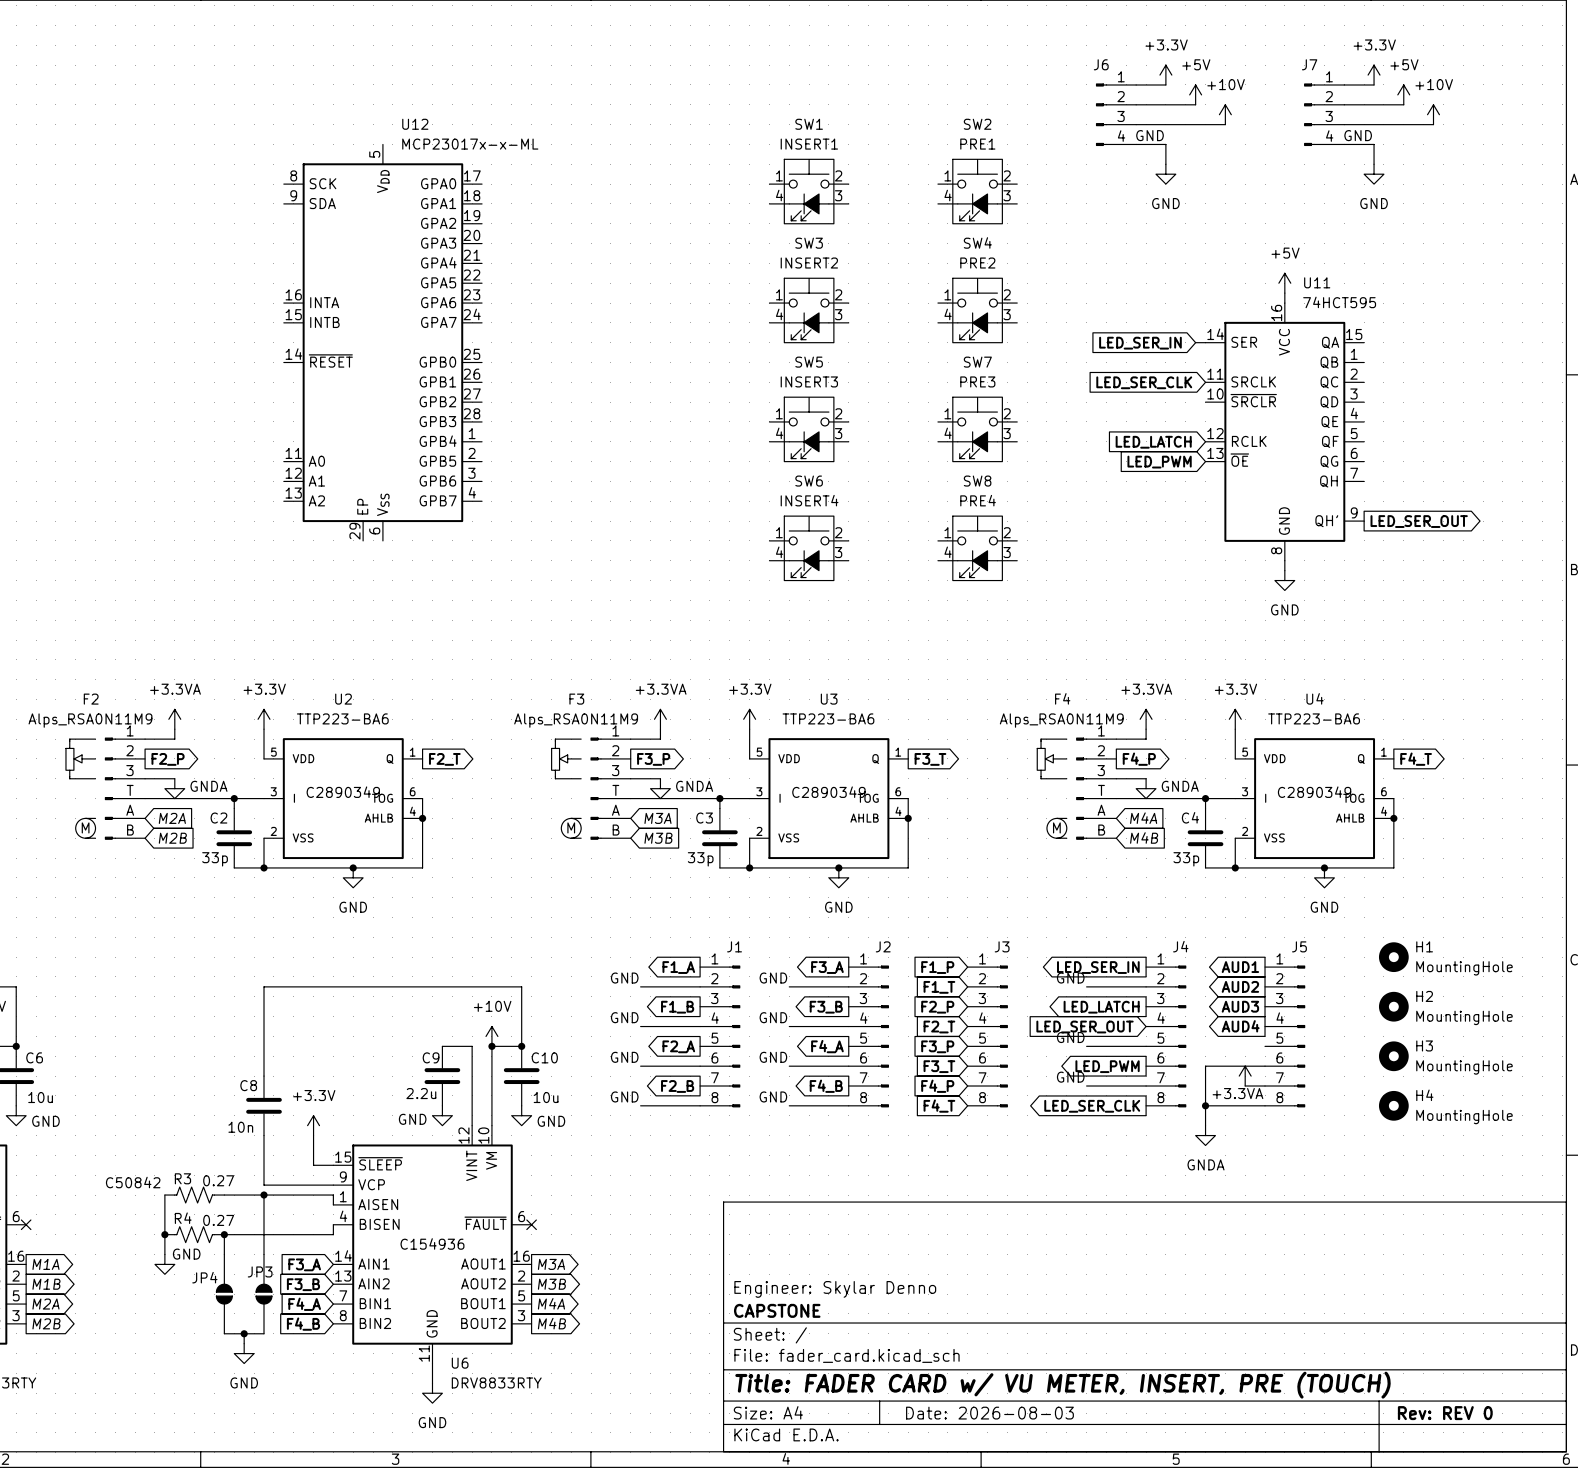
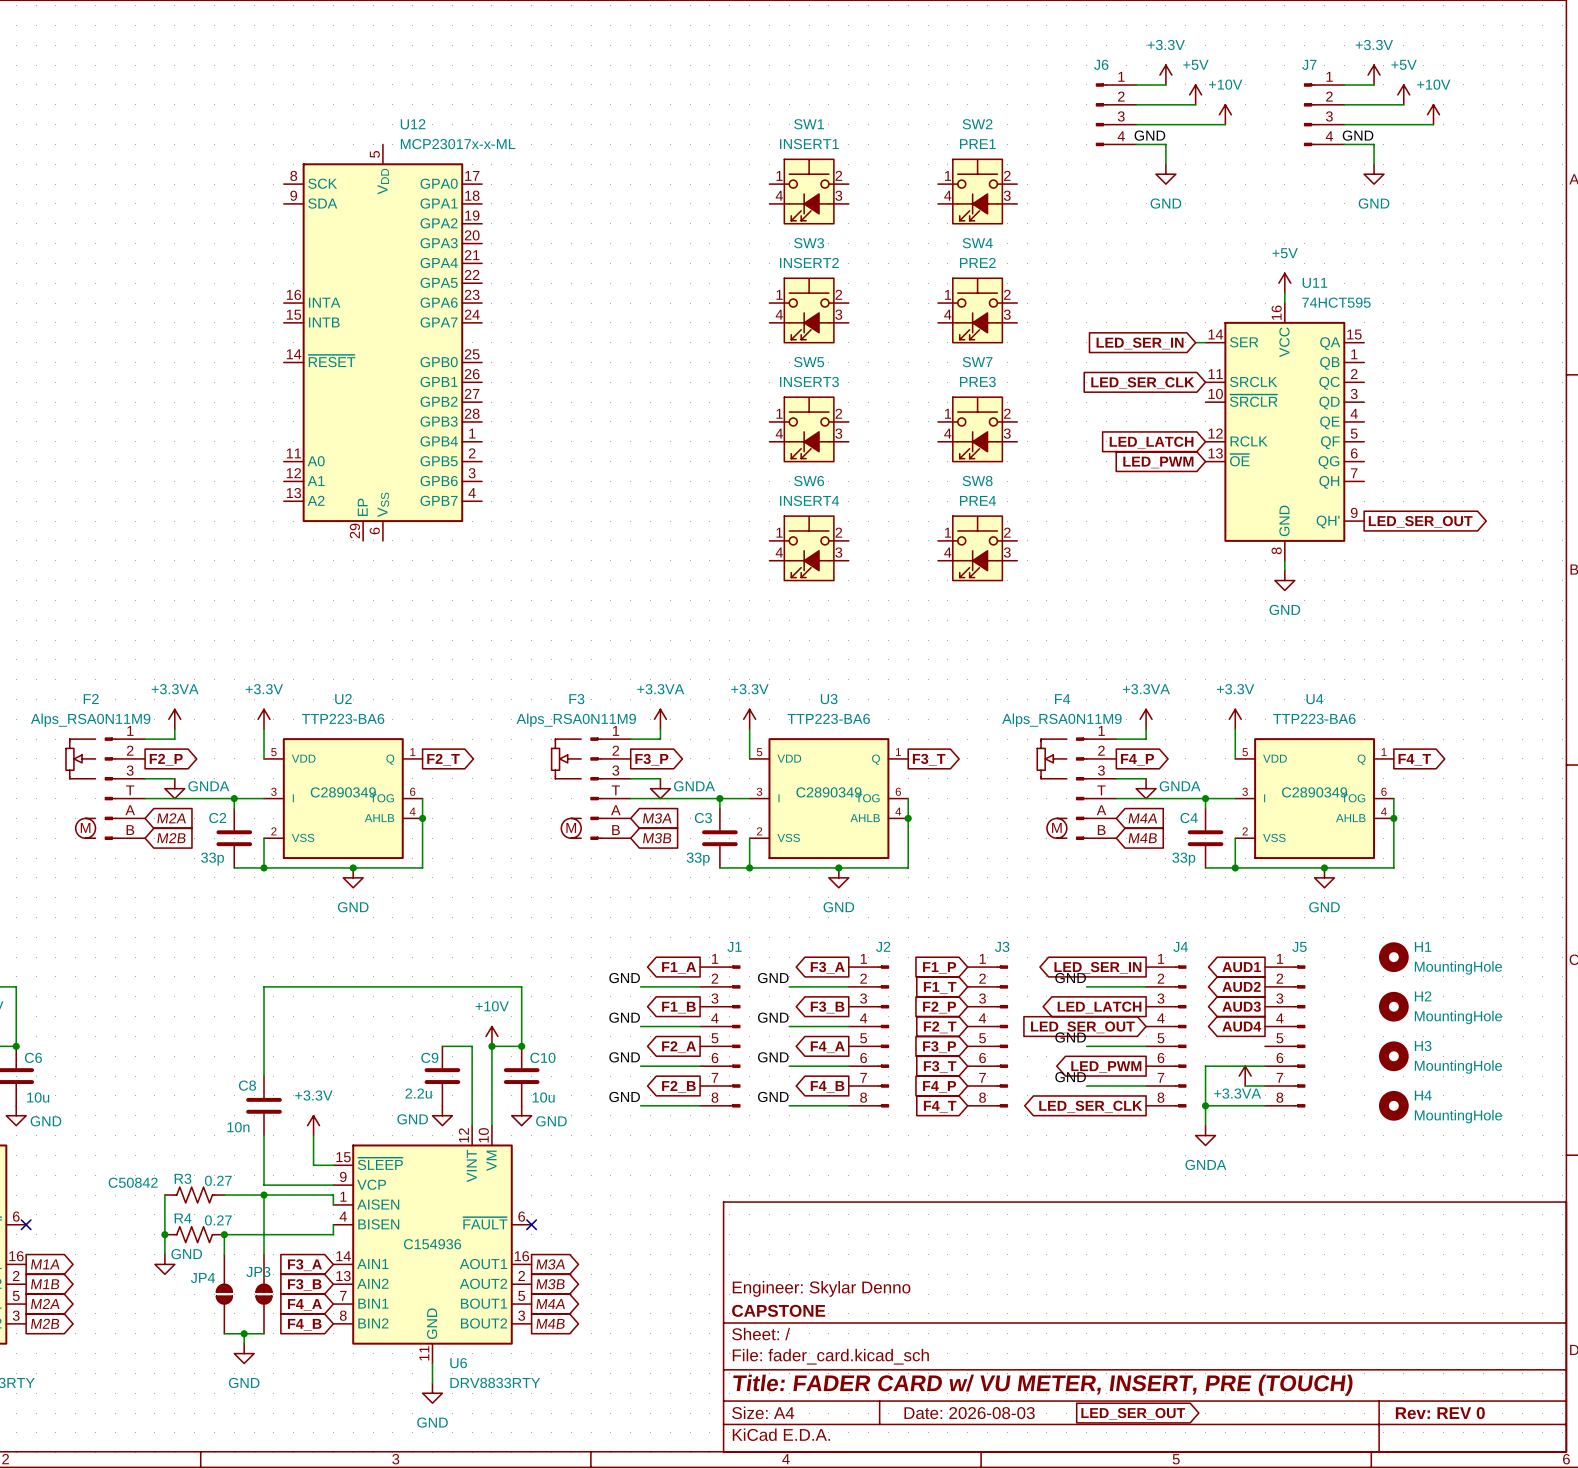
global label: none -> LED_SER_OUT (1133, 1413)

